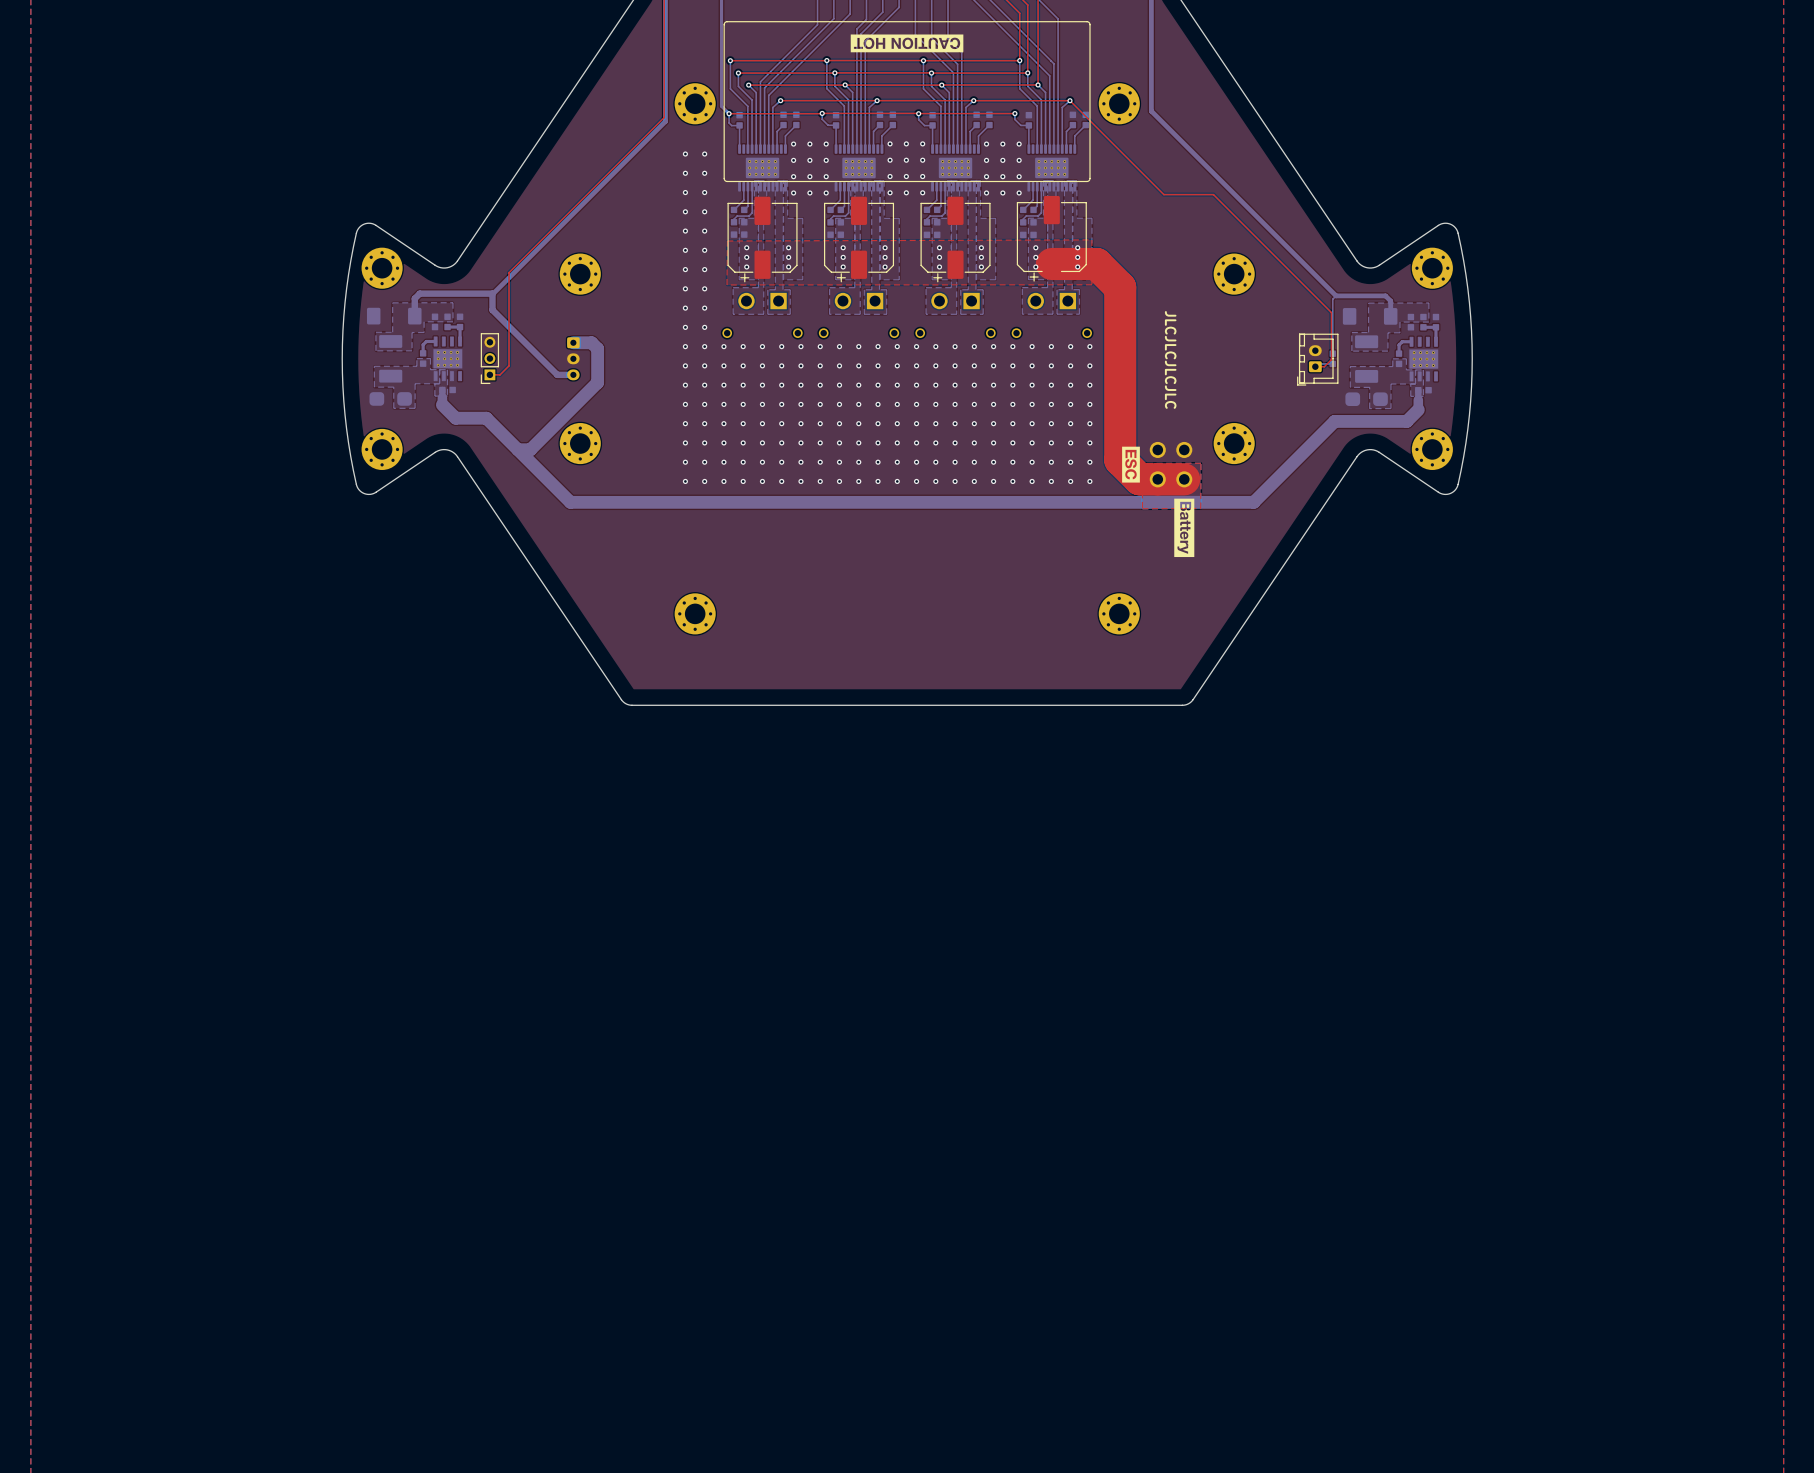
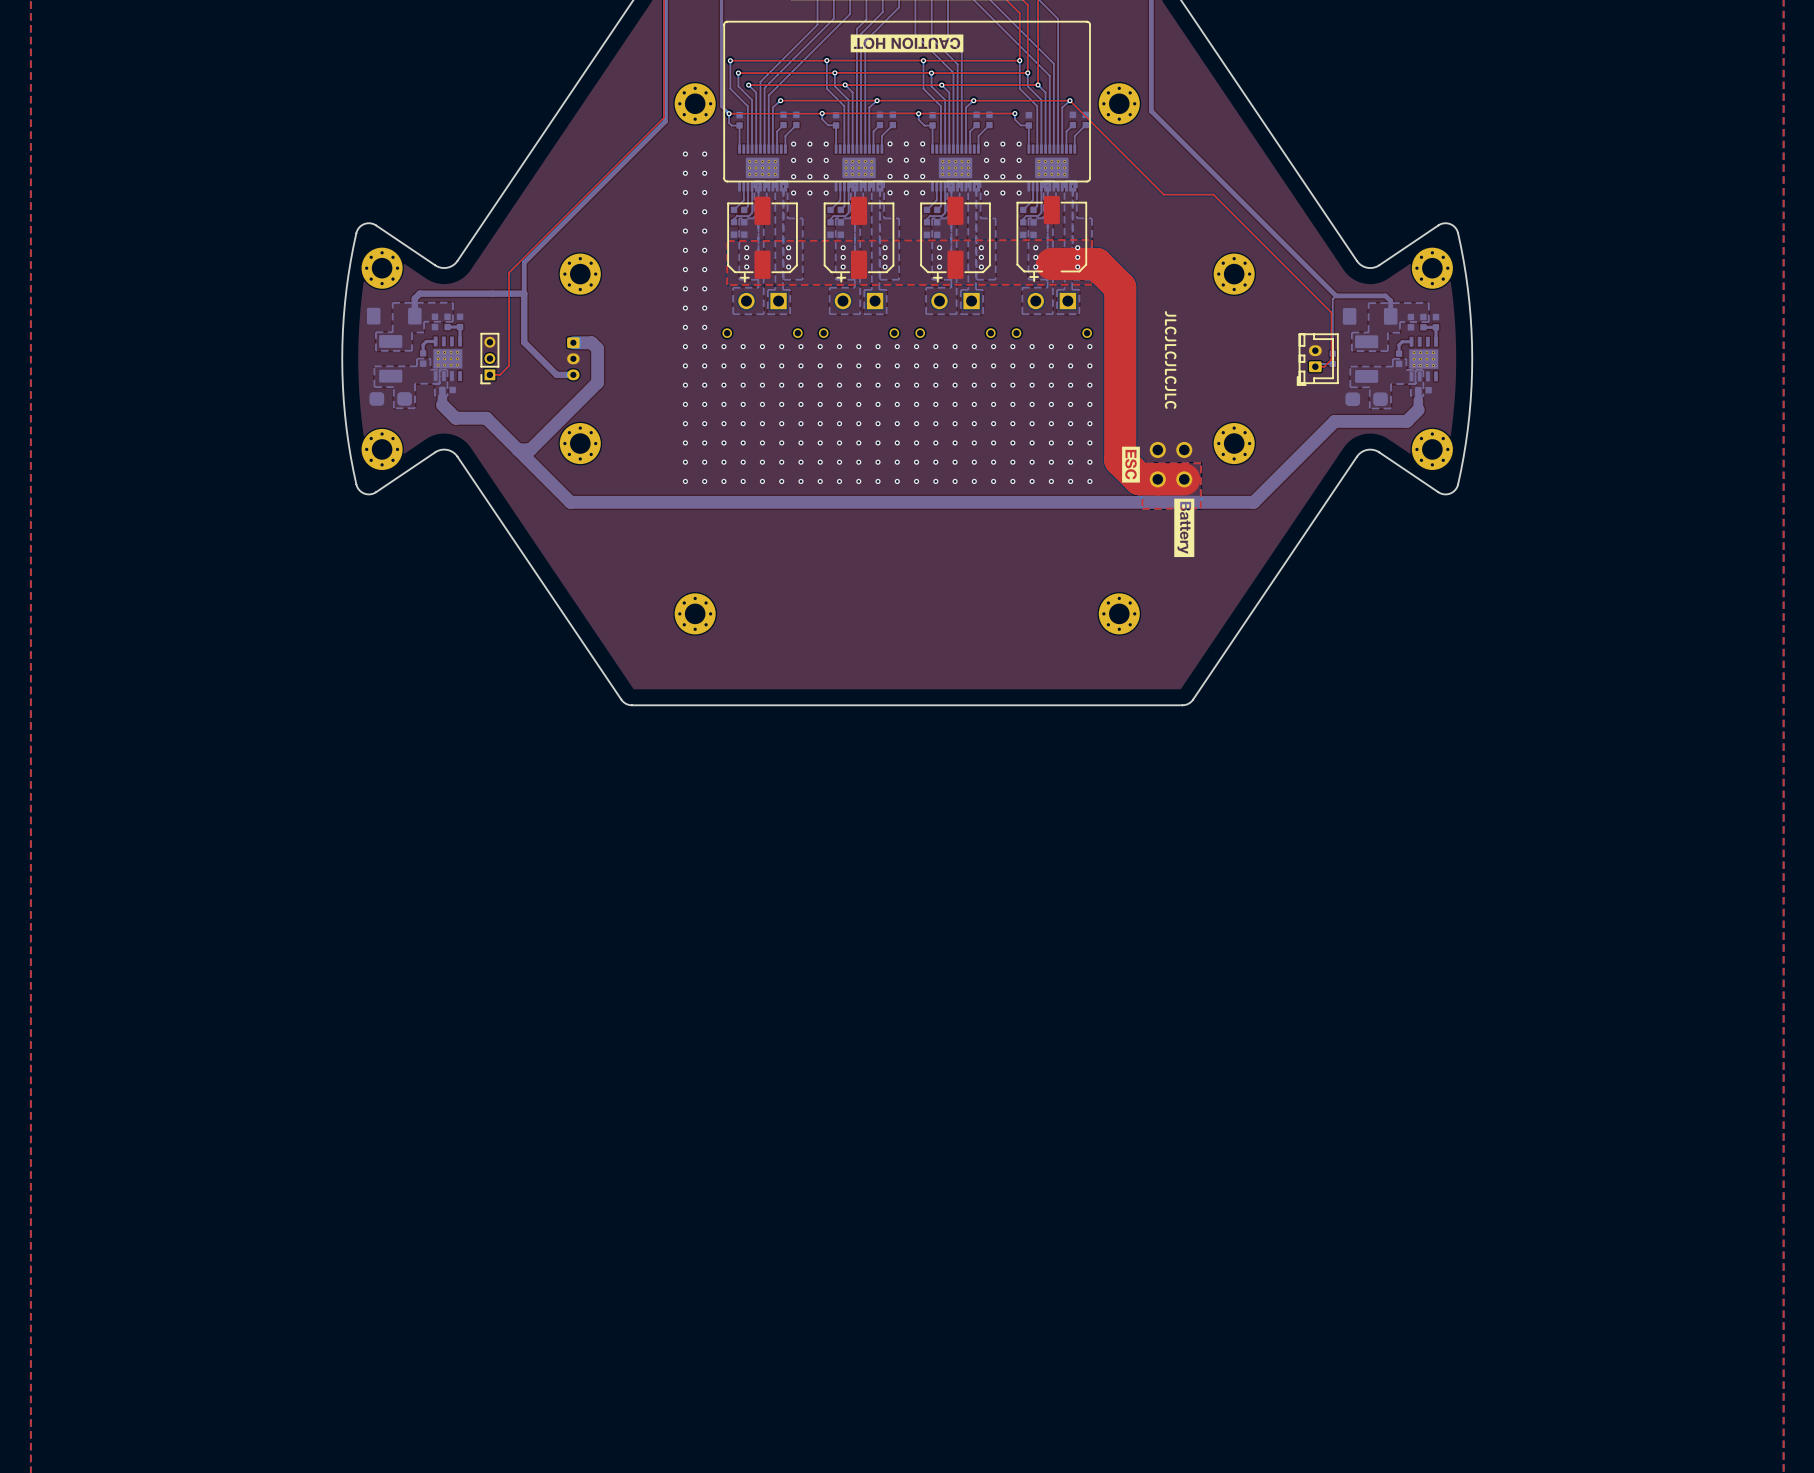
bottom track: (524, 262) (493, 293) -> (524, 262) (524, 293)
bottom track: (492, 293) (492, 310) (557, 374) -> (524, 293) (524, 342) (557, 374)
bottom track: none -> (493, 293) (524, 293)

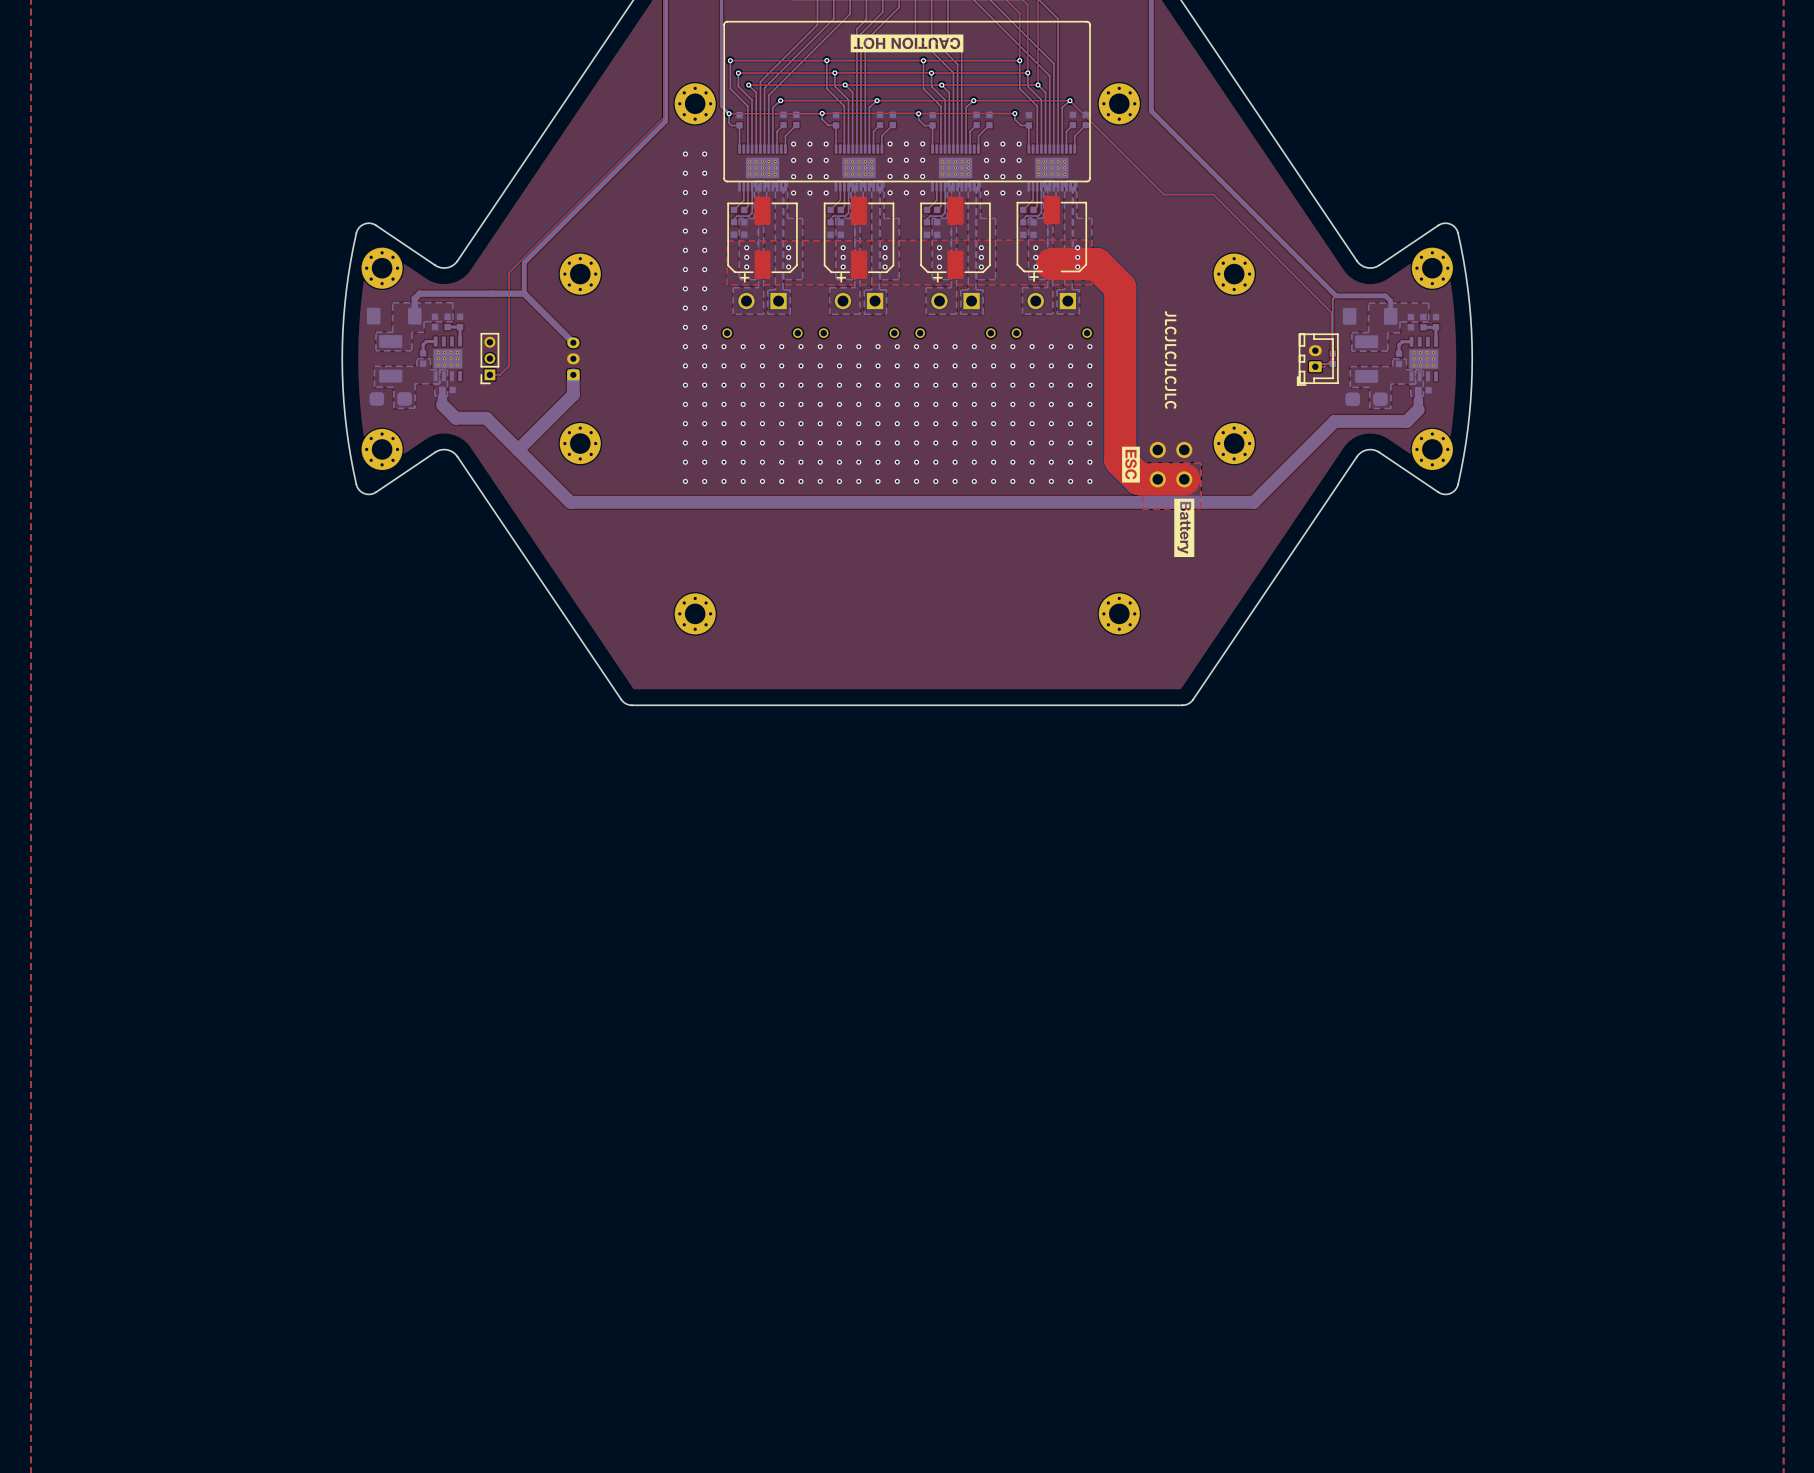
bottom track: (524, 293) (524, 342) (556, 374) (573, 374) -> (524, 293) (573, 342)
bottom track: (573, 342) (591, 342) (597, 348) (597, 382) (530, 449) (518, 449) -> (573, 374) (573, 394) (518, 449)
part rotation: 0° (573, 358) -> 180° (573, 358)

